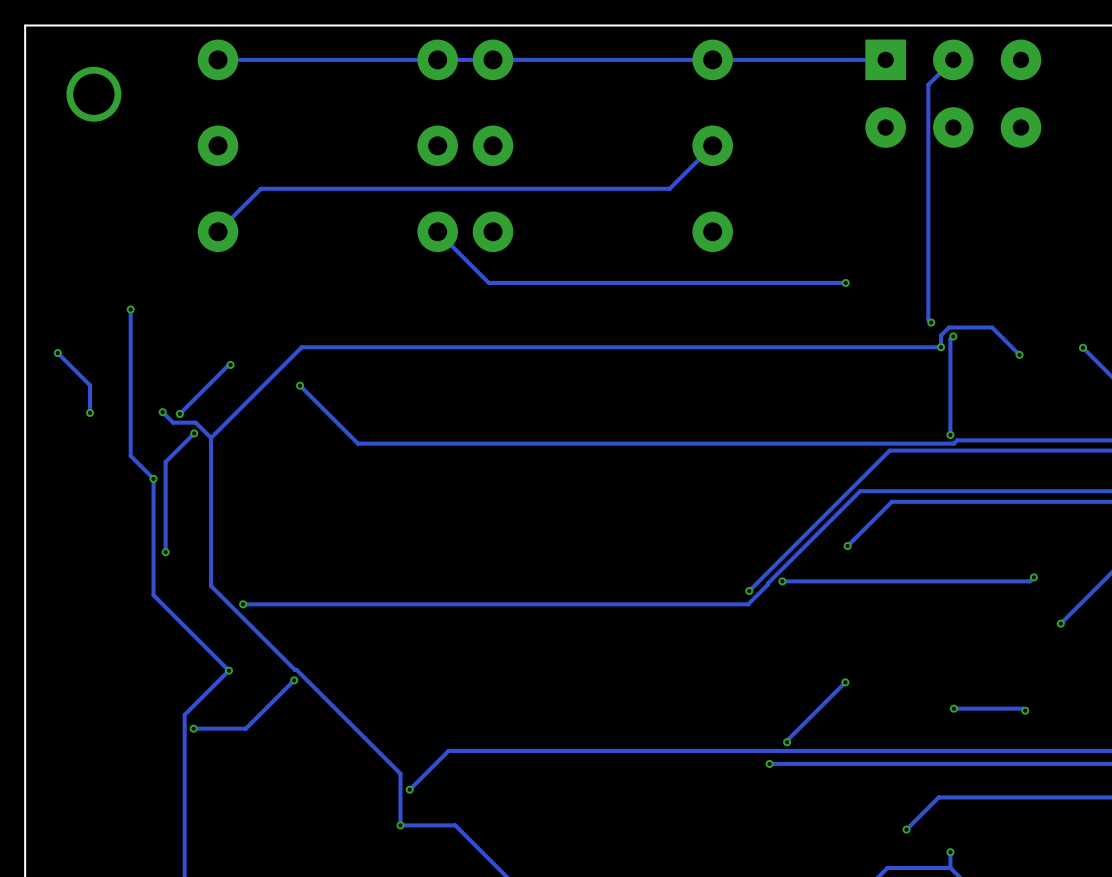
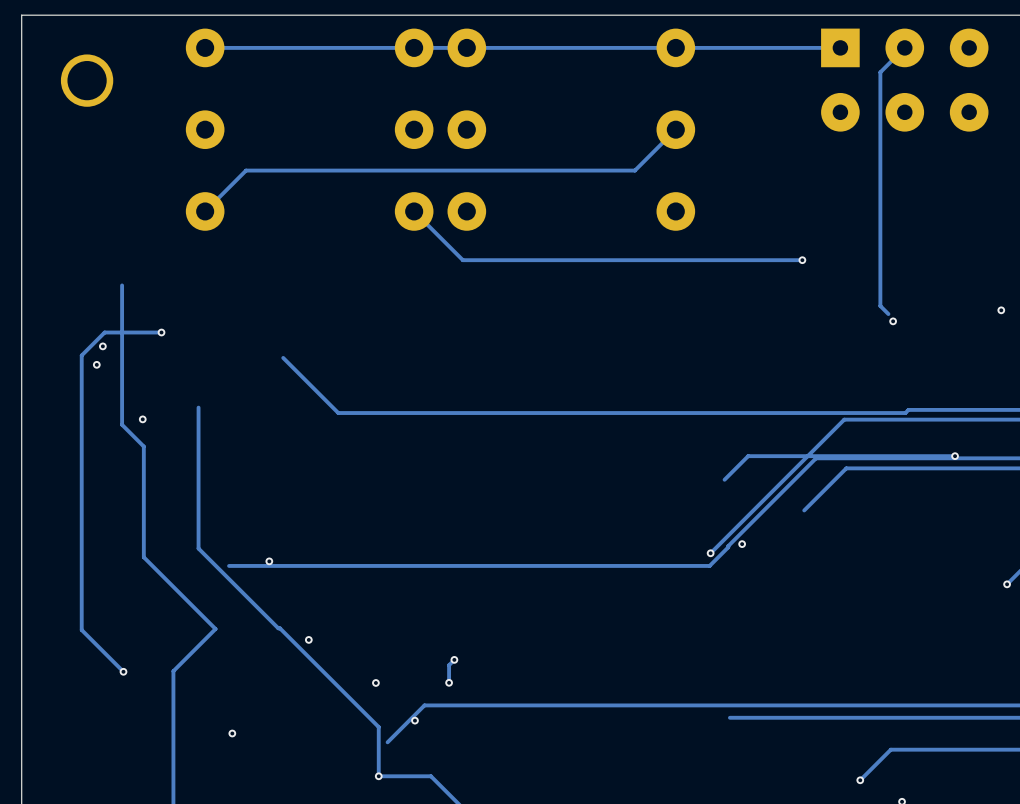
track: (928, 84) (928, 319) (931, 322) -> (881, 71) (880, 306) (888, 314)
via: (130, 309) -> none
via: (931, 322) -> none
track: (953, 336) (950, 339) (950, 434) -> none
via: (953, 336) -> none
track: (57, 353) (90, 385) (90, 412) -> none
via: (57, 353) -> none
track: (1019, 354) (992, 327) (949, 327) (941, 335) (941, 347) (301, 347) (211, 437) (195, 422) (173, 422) (162, 412) -> none
via position: (1019, 354) -> (1001, 310)
track: none -> (161, 332) (104, 332) (81, 355) (81, 630) (123, 671)
via: none -> (161, 332)
track: (230, 364) (179, 413) -> none
via: (230, 364) -> none
via: none -> (102, 346)
via: (300, 385) -> none
via: none -> (96, 364)
via: (90, 412) -> none
via: (162, 412) -> none
via: (179, 413) -> none
track: (194, 433) (165, 462) (165, 552) -> none
via: (194, 433) -> none
via: (950, 434) -> none
via: none -> (142, 419)
via: (153, 478) -> none
track: none -> (955, 456) (748, 456) (724, 479)
via: none -> (955, 456)
via: (847, 546) -> none
via: (165, 552) -> none
track: (1033, 577) (1029, 581) (782, 581) -> none
via: (1033, 577) -> none
via: none -> (269, 561)
via: (243, 604) -> none
via: (228, 670) -> none
track: (294, 680) (245, 728) (193, 728) -> none
via position: (294, 680) -> (308, 639)
track: (845, 682) (787, 742) -> none
via: (845, 682) -> none
track: none -> (454, 659) (449, 665) (449, 682)
via: none -> (454, 659)
track: (953, 708) (1023, 708) (1025, 710) -> none
via: (953, 708) -> none
via: (1025, 710) -> none
via: none -> (123, 671)
via: none -> (375, 682)
via: none -> (449, 682)
via: (193, 728) -> none
via: (787, 742) -> none
via: (769, 763) -> none
via: none -> (414, 720)
via: none -> (232, 733)
via: (409, 789) -> none

